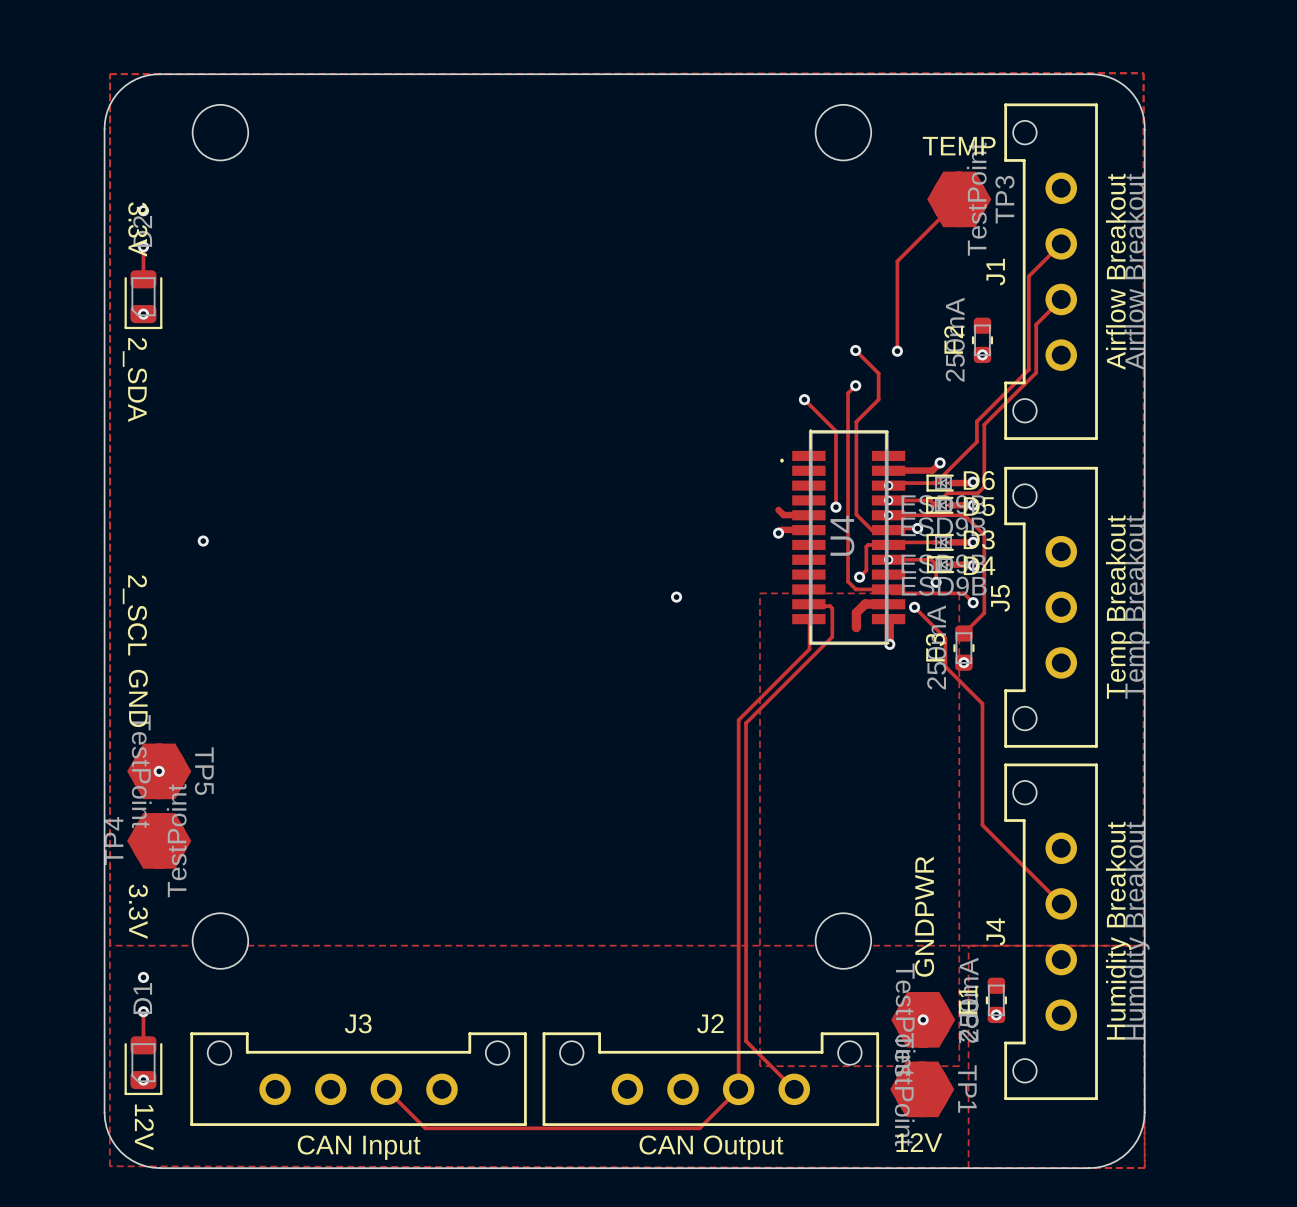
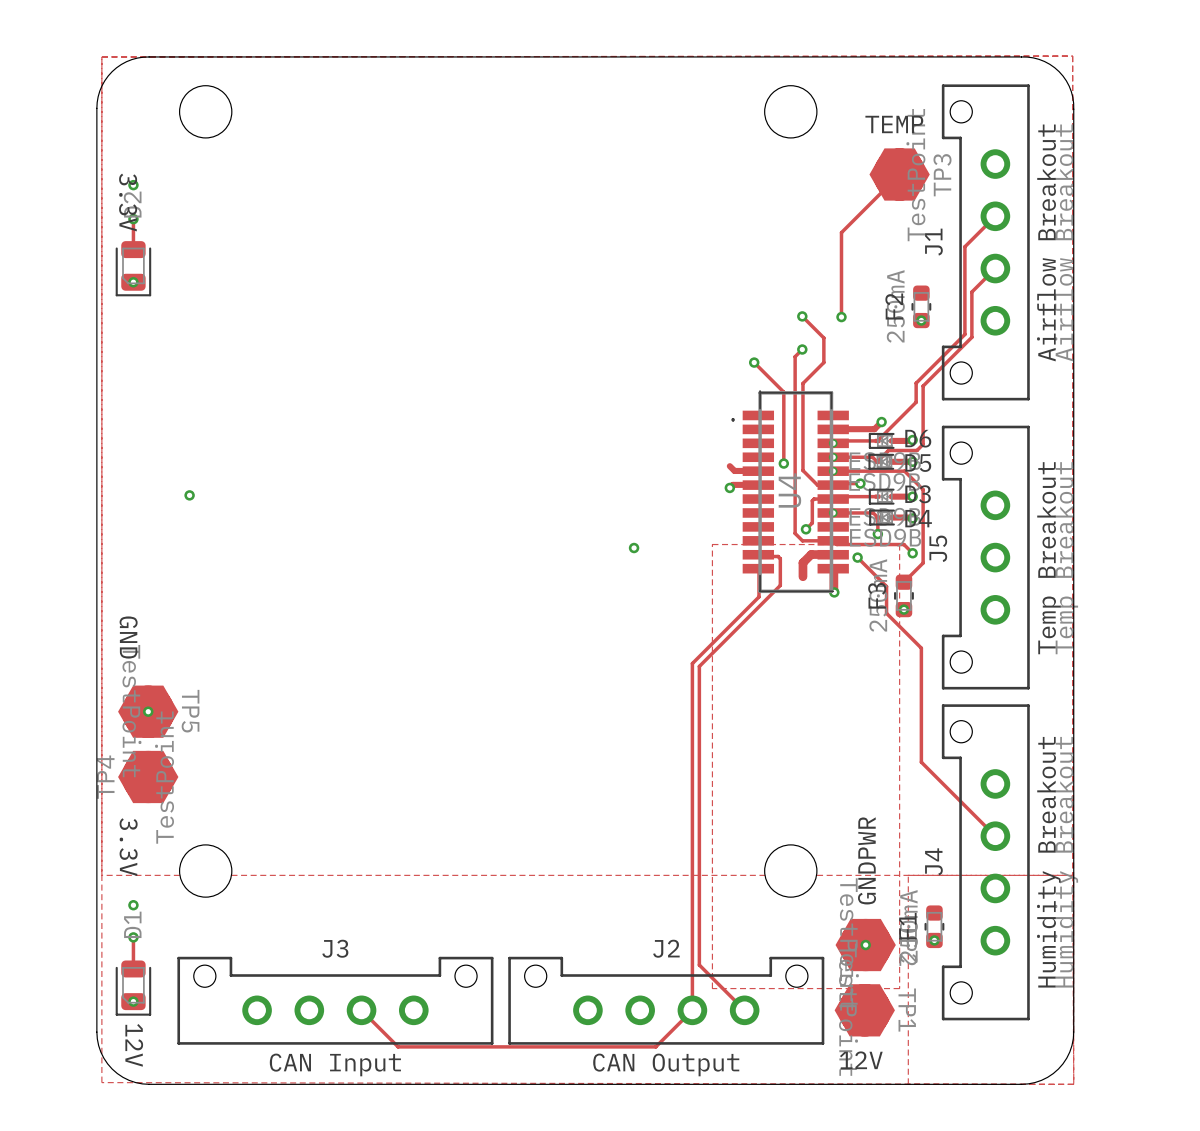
text: 2_SDA (134, 379) -> none
text: 2_SCL (134, 615) -> none

